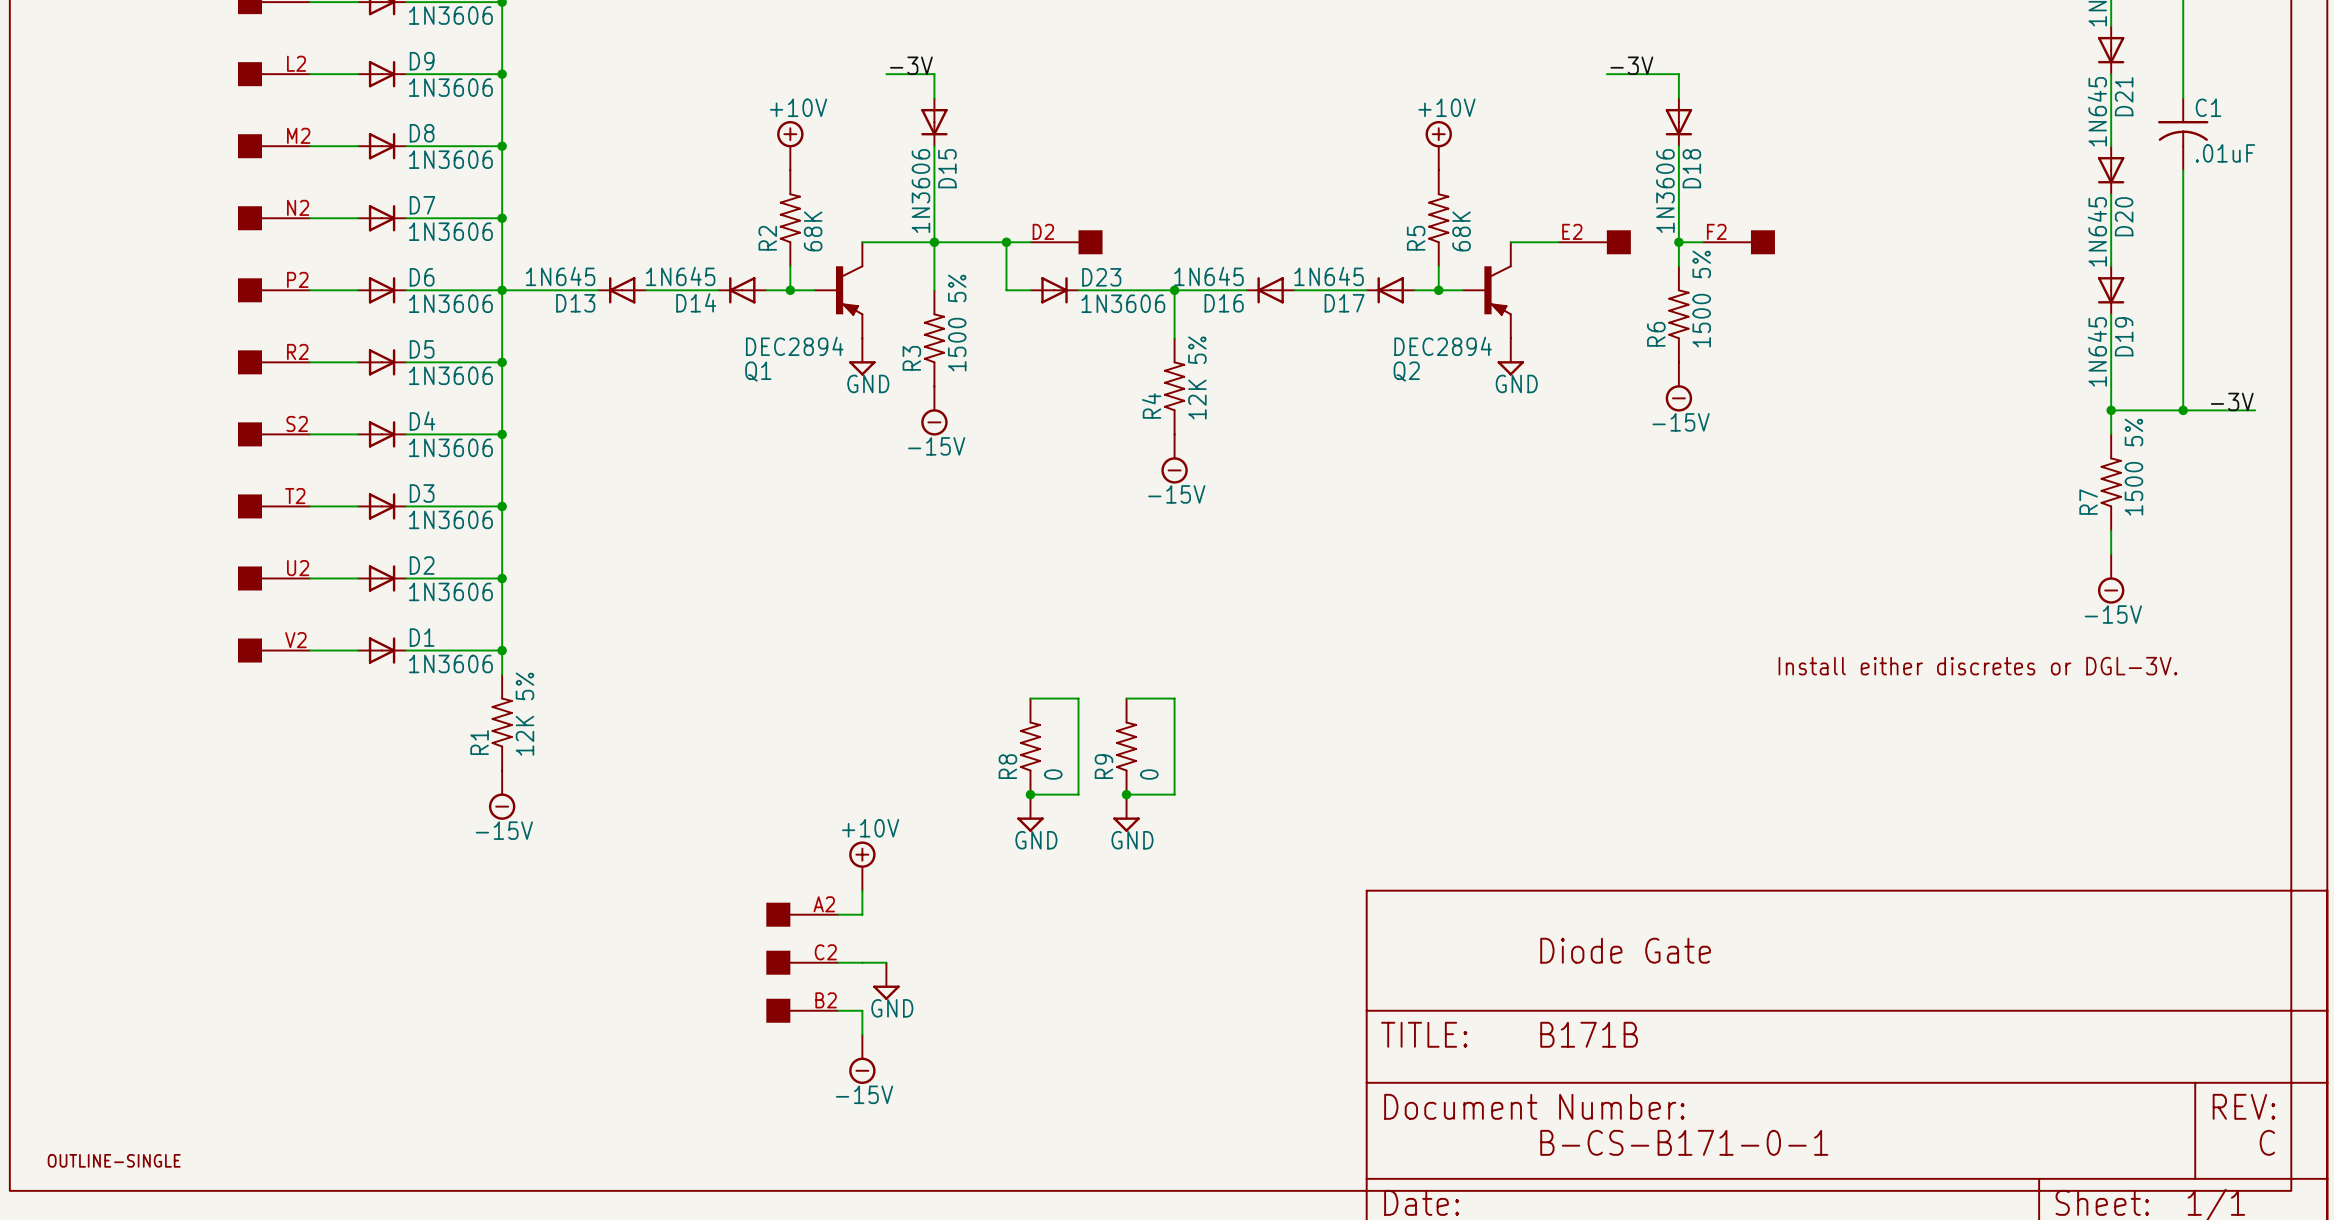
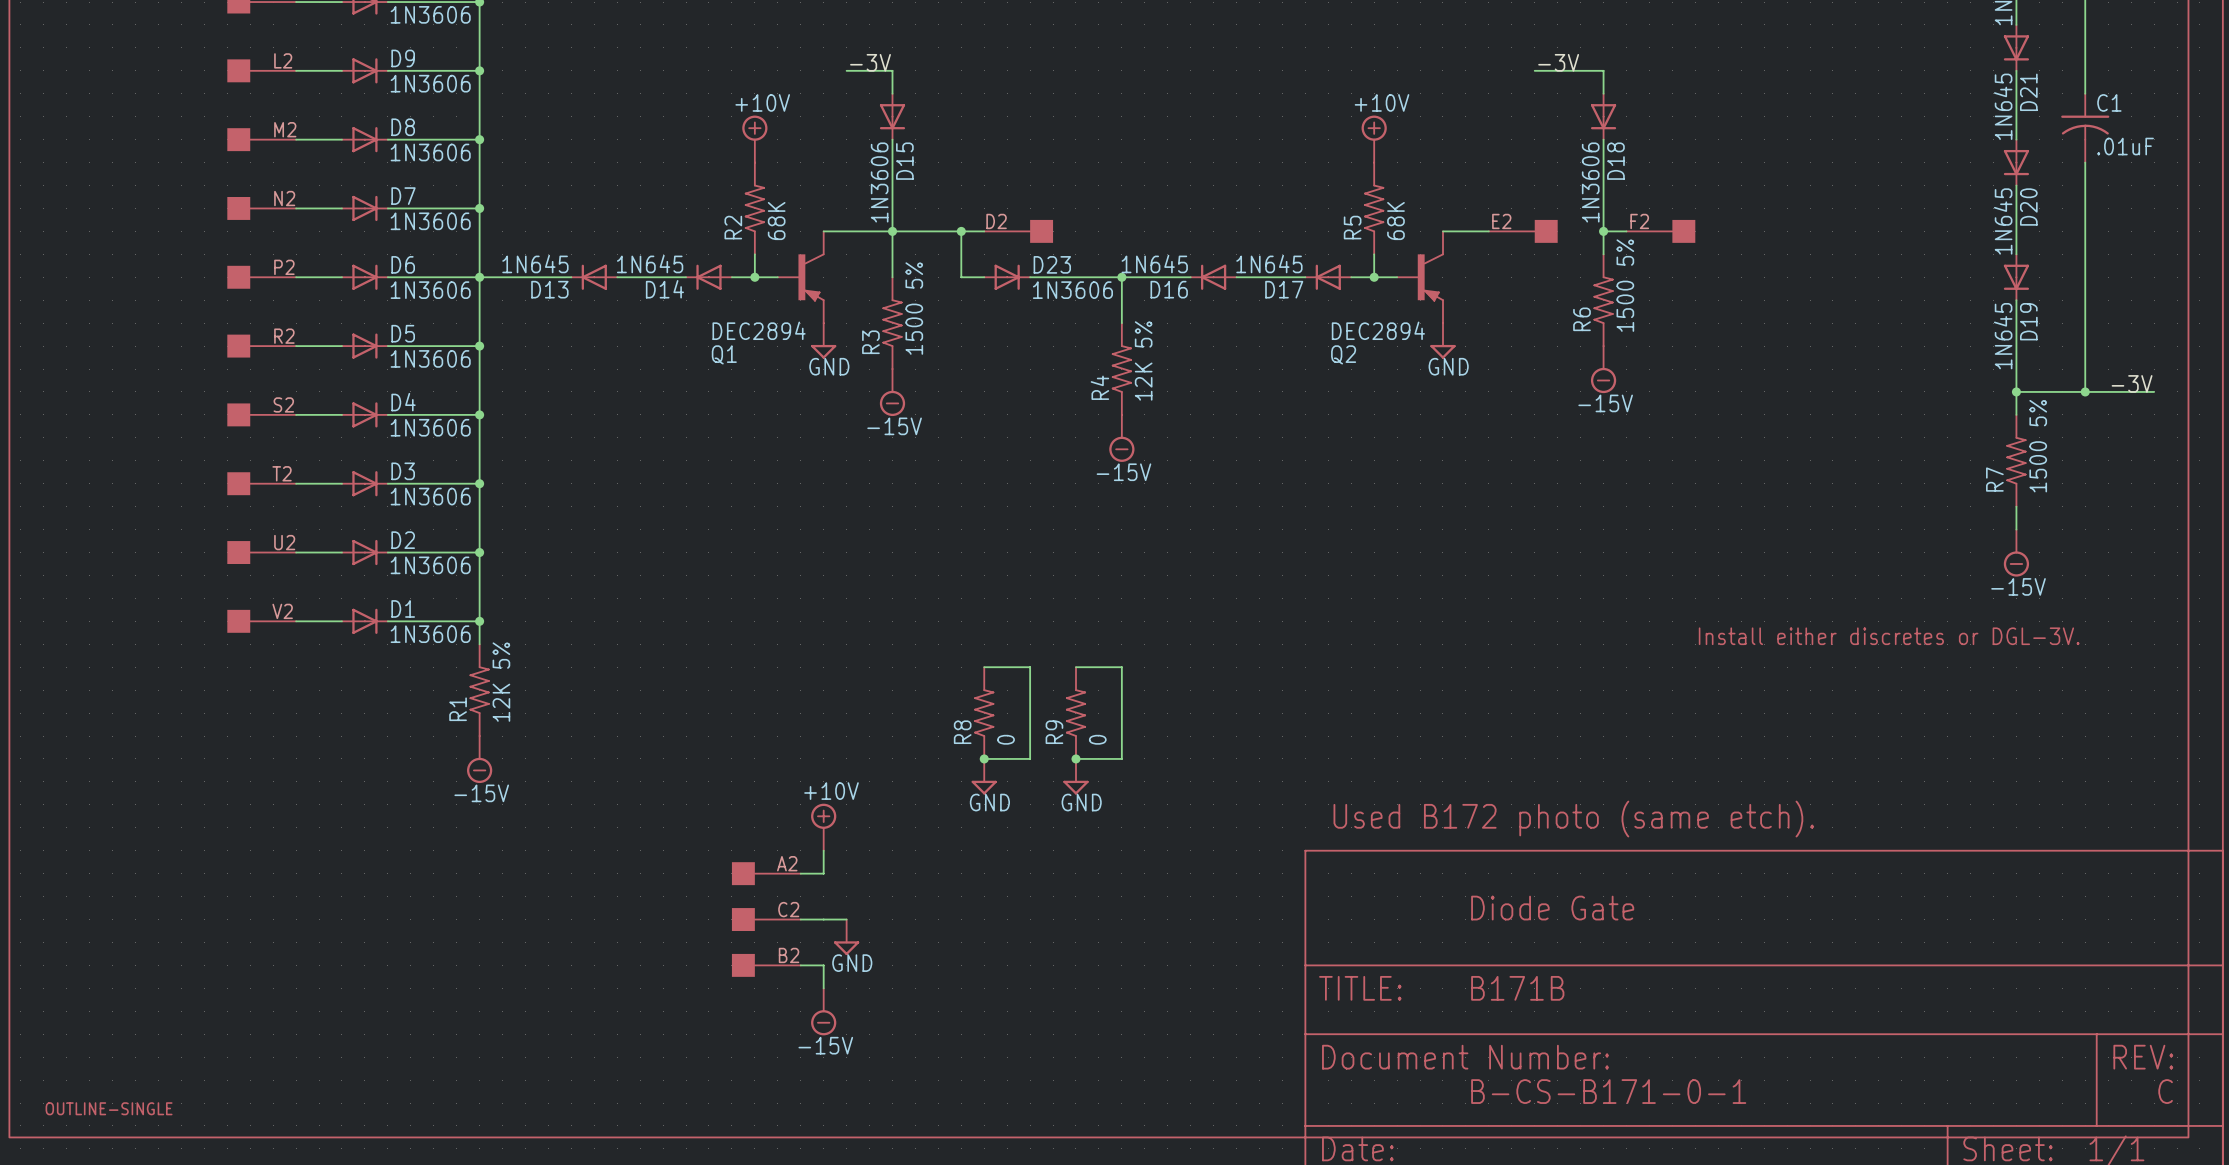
text: none -> Used B172 photo (same etch). (1573, 819)

